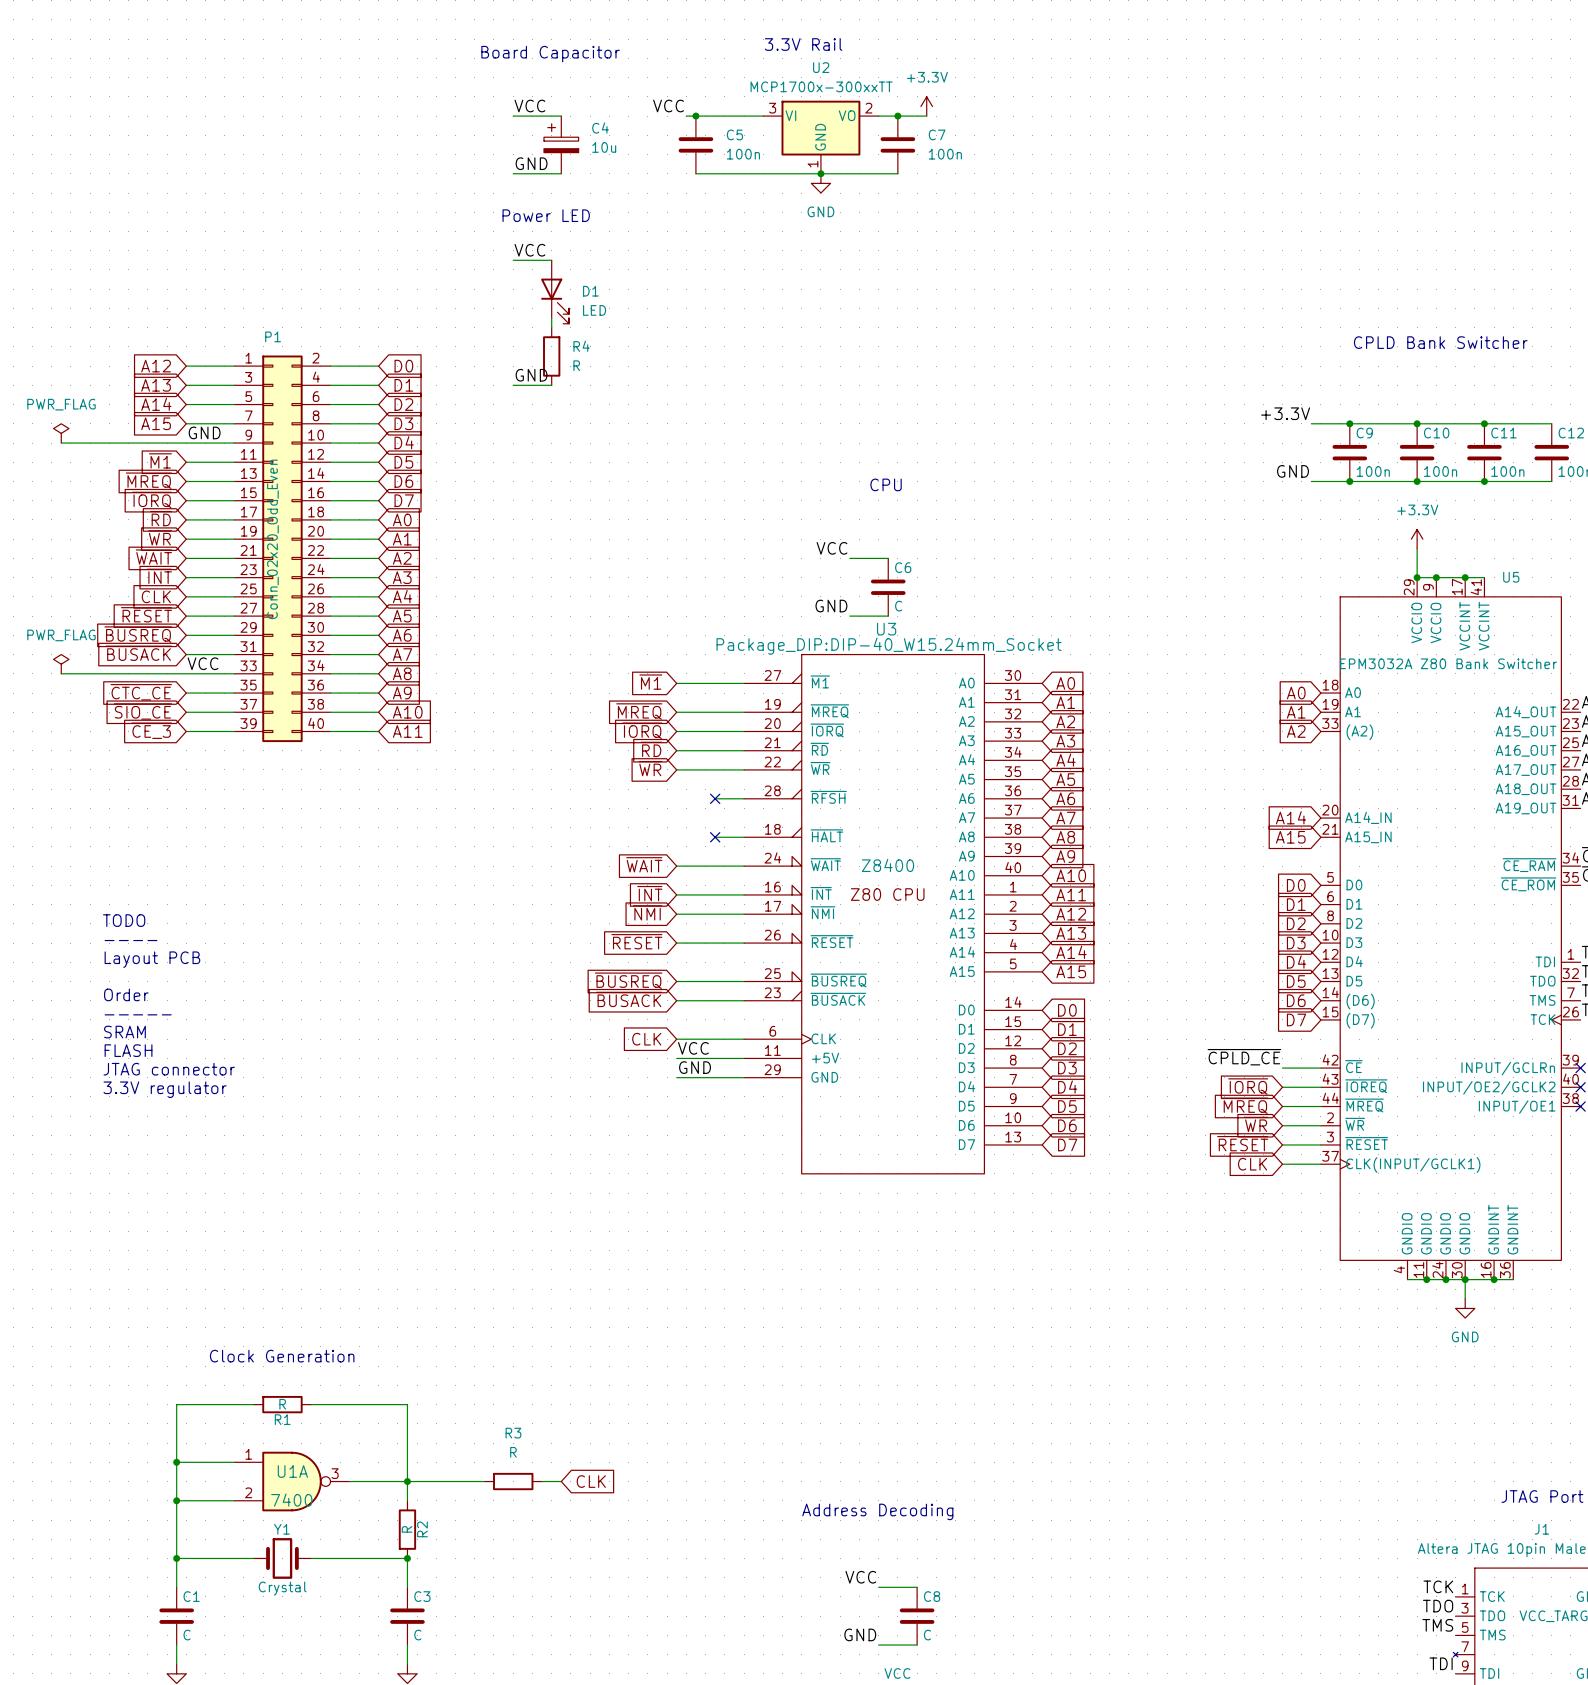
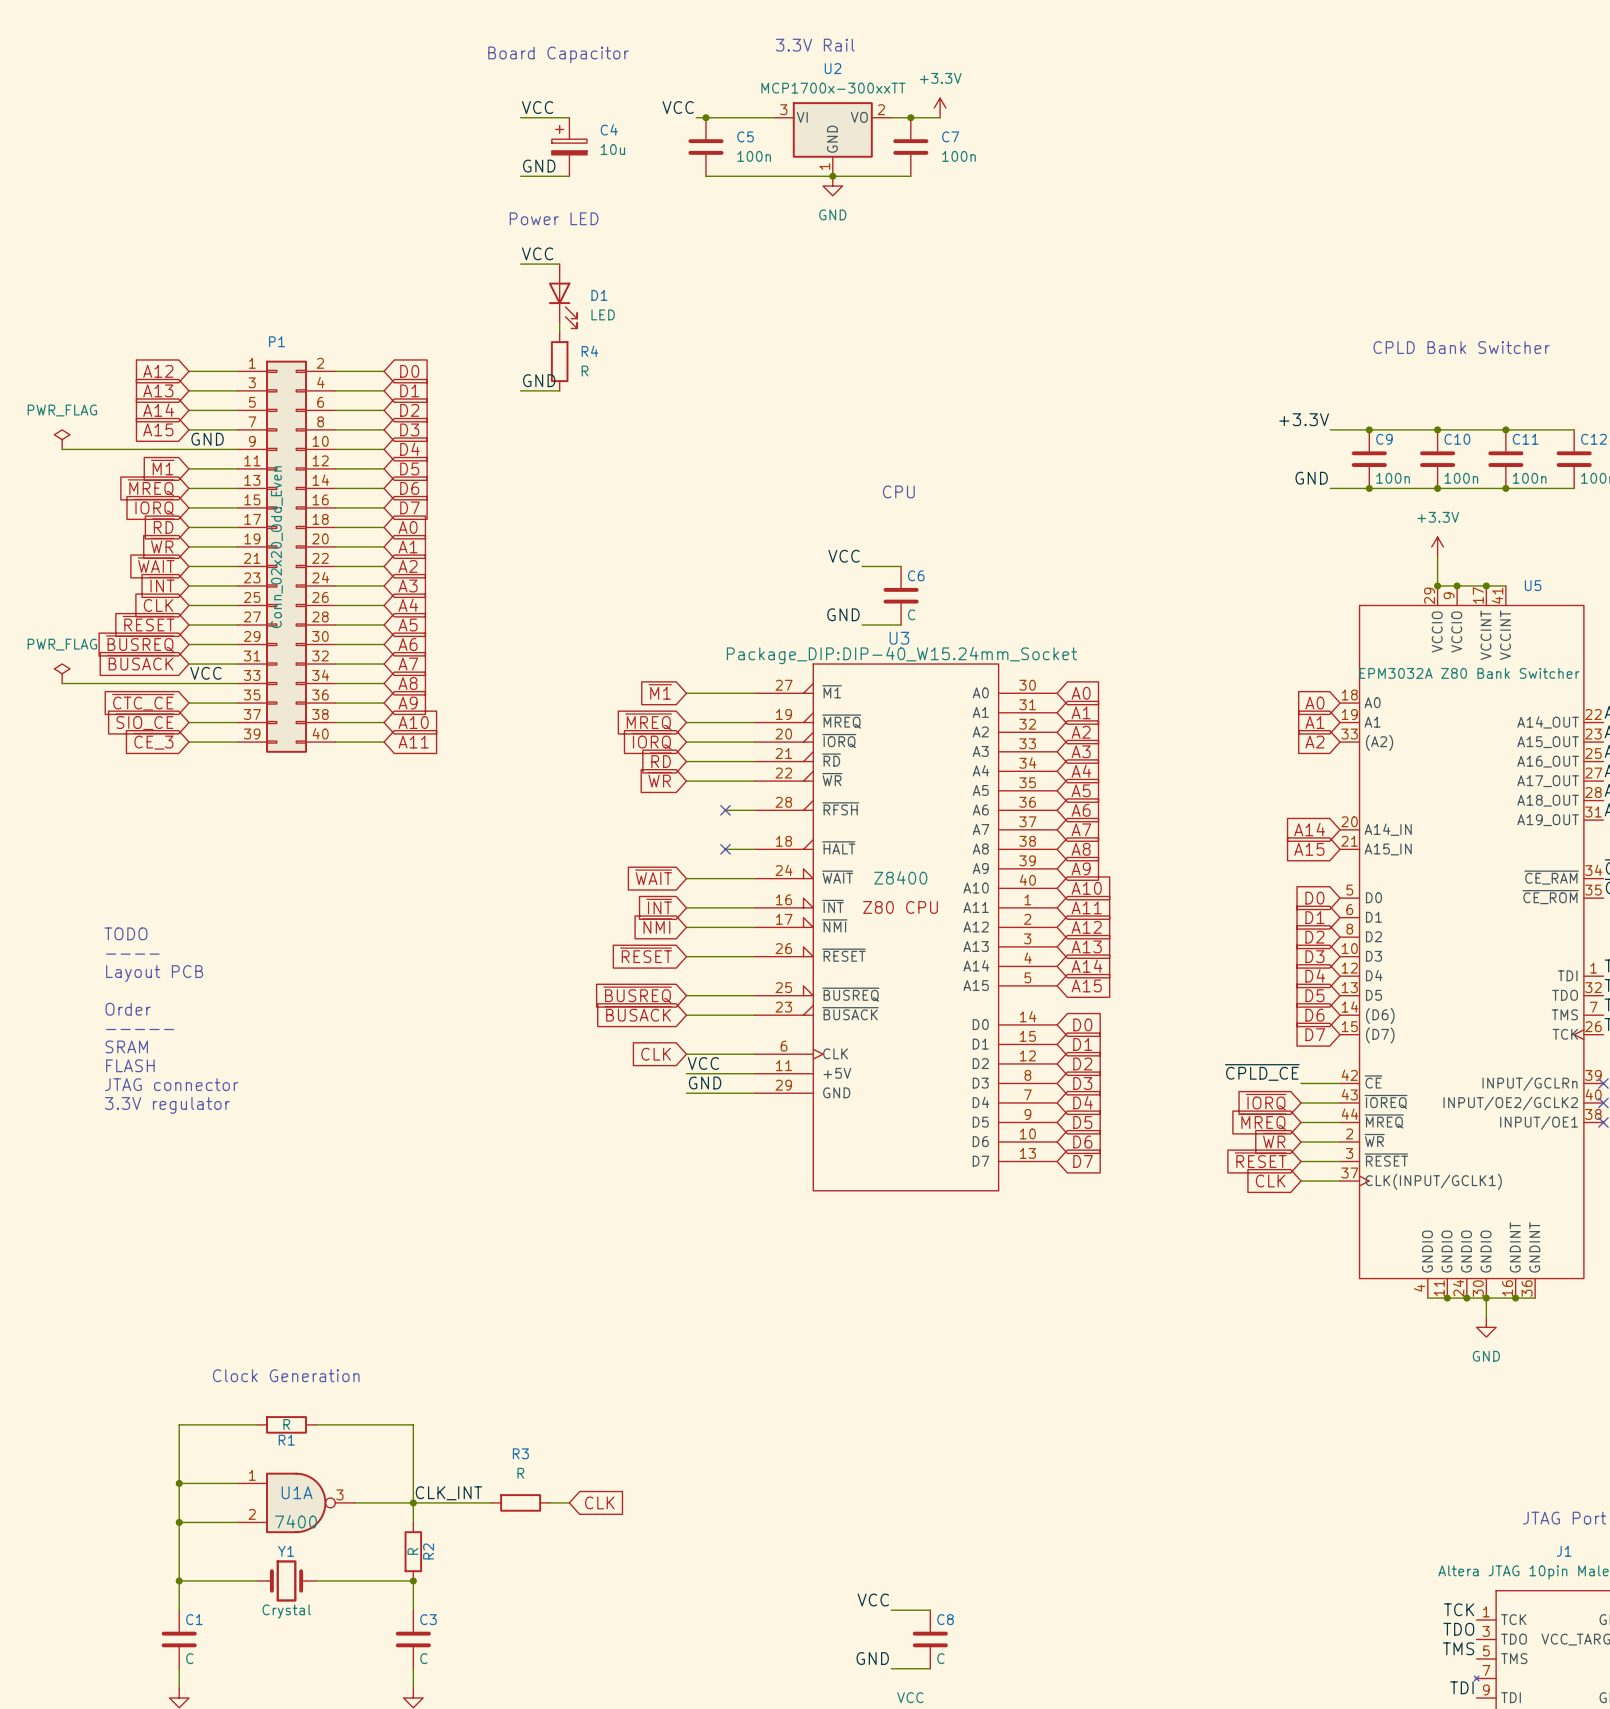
label: none -> CLK_INT (448, 1493)
text: Address Decoding (877, 1511) -> none

